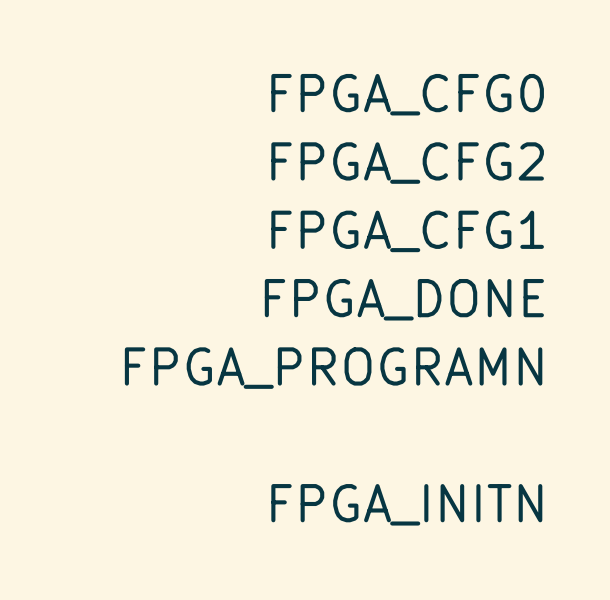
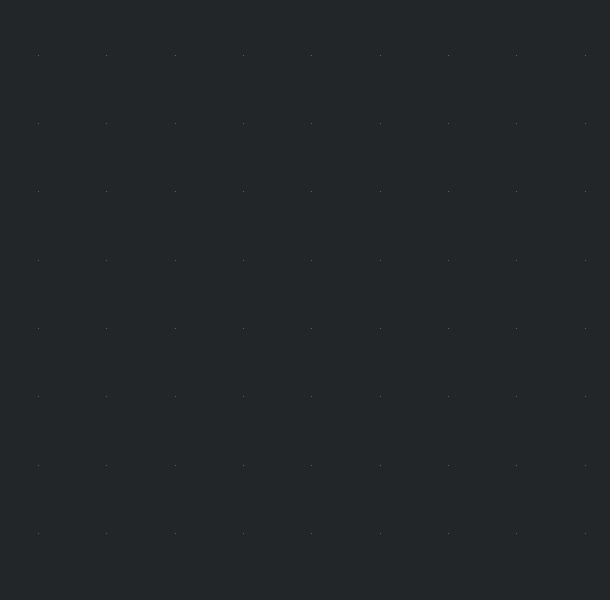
label: FPGA_CFG0 (407, 94) -> none
label: FPGA_CFG2 (407, 163) -> none
label: FPGA_CFG1 (407, 231) -> none
label: FPGA_DONE (404, 299) -> none
label: FPGA_PROGRAMN (333, 368) -> none
label: FPGA_INITN (406, 504) -> none

